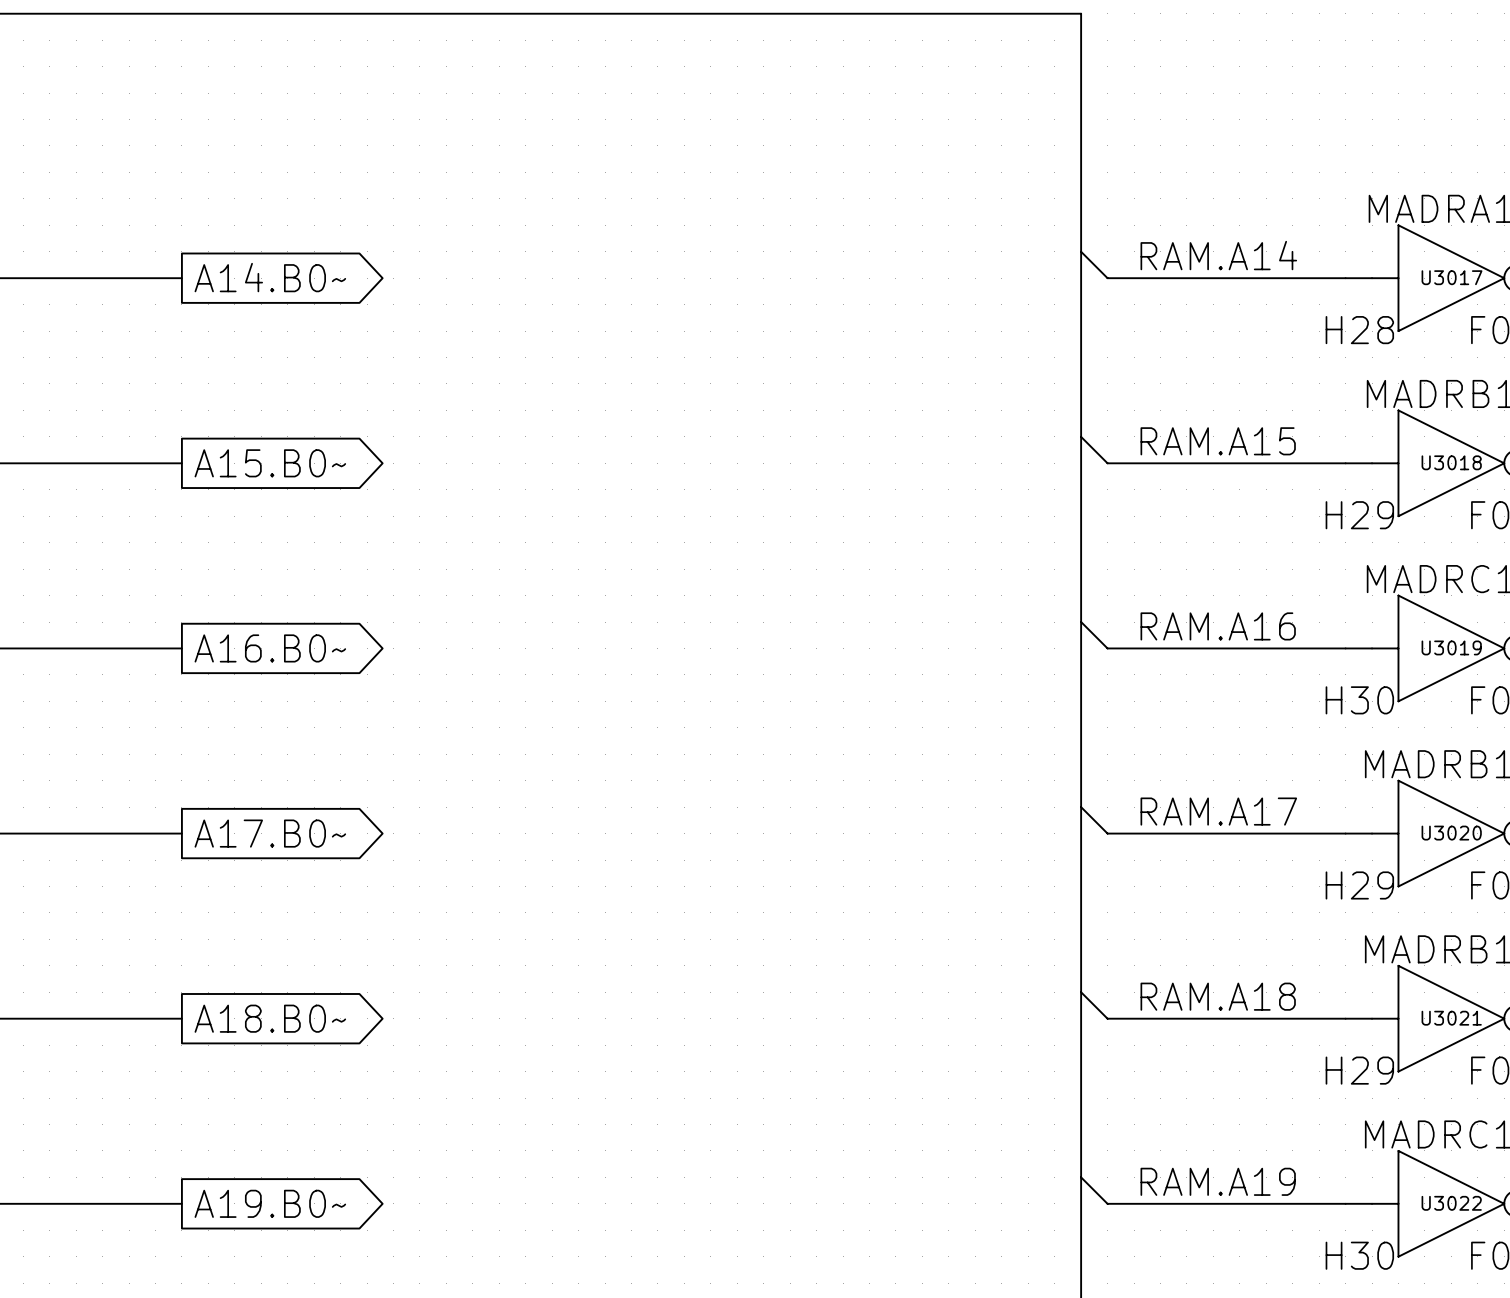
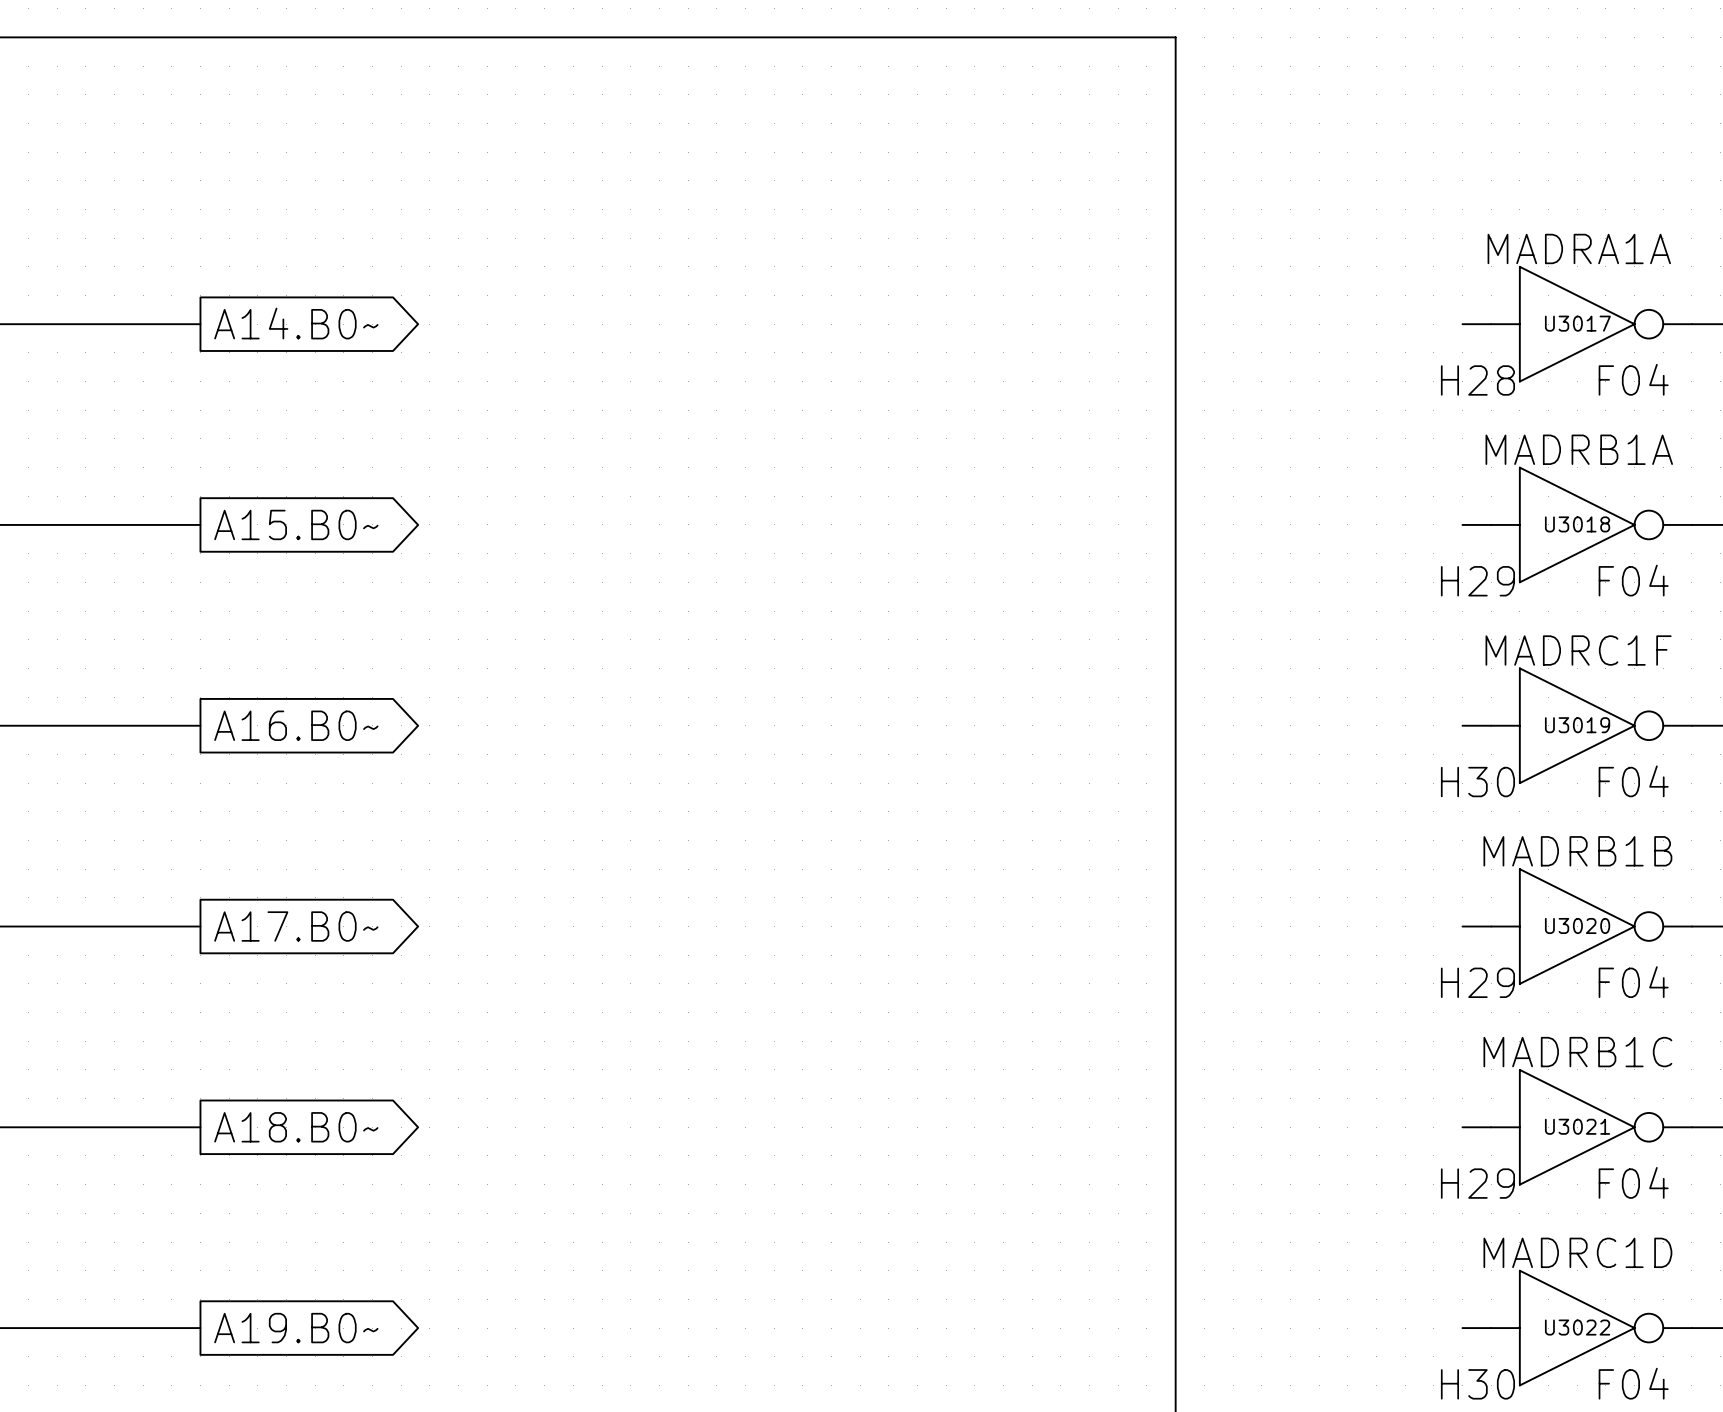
wire: (1081, 251) (1107, 278) (1345, 278) -> none
label: RAM.A14 (1218, 255) -> none
wire: (1081, 436) (1107, 463) (1345, 463) -> none
label: RAM.A15 (1218, 441) -> none
wire: (1081, 622) (1107, 648) (1345, 648) -> none
label: RAM.A16 (1218, 626) -> none
wire: (1081, 807) (1107, 833) (1345, 833) -> none
label: RAM.A17 (1218, 811) -> none
wire: (1081, 992) (1107, 1018) (1345, 1018) -> none
label: RAM.A18 (1218, 996) -> none
wire: (1081, 1177) (1107, 1203) (1345, 1203) -> none
label: RAM.A19 (1218, 1181) -> none

